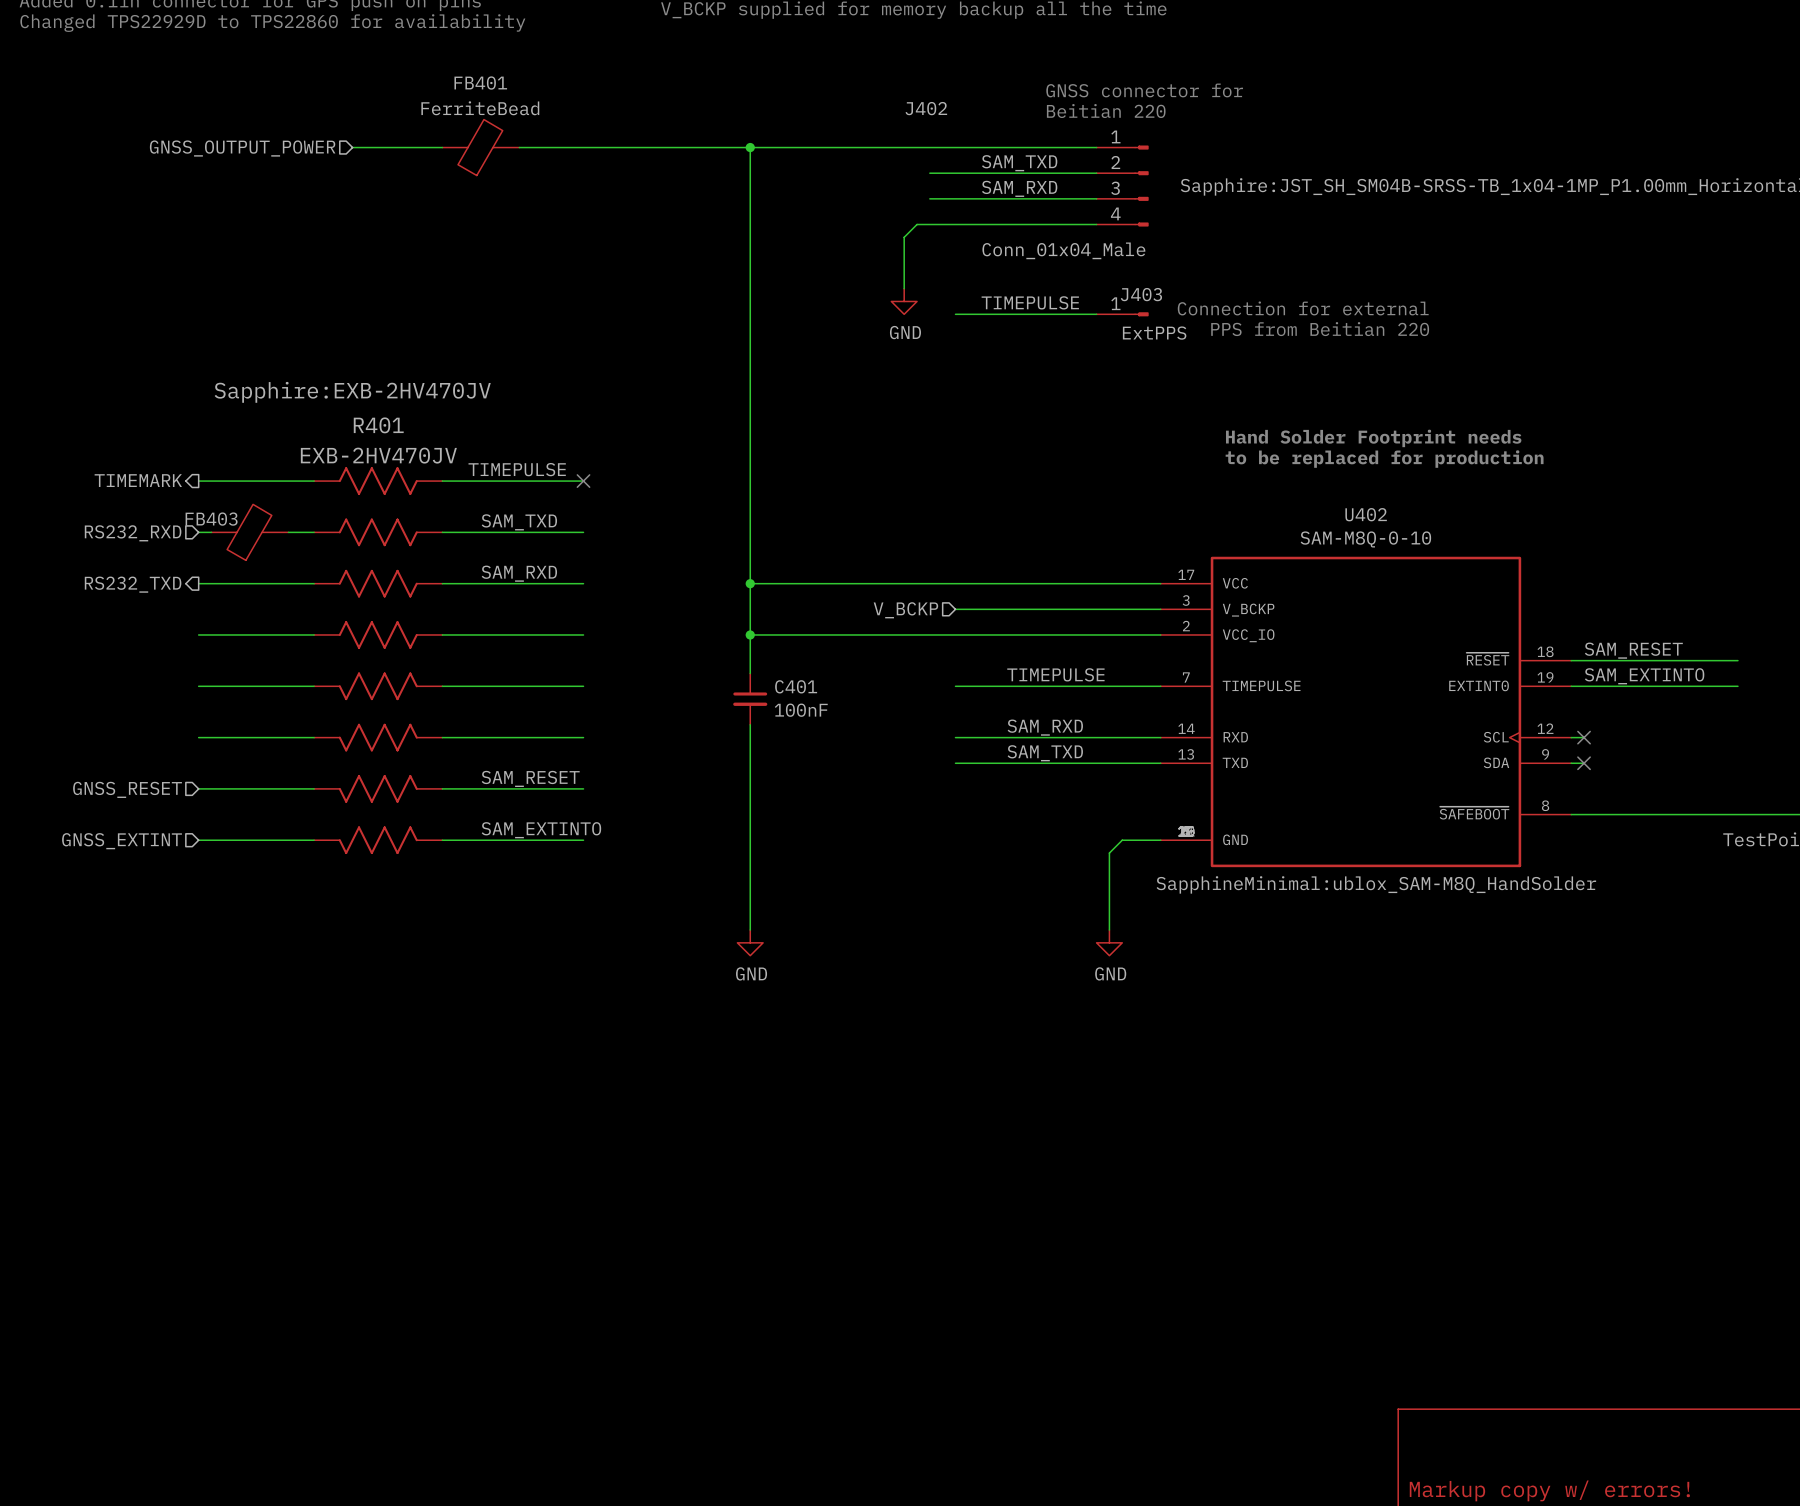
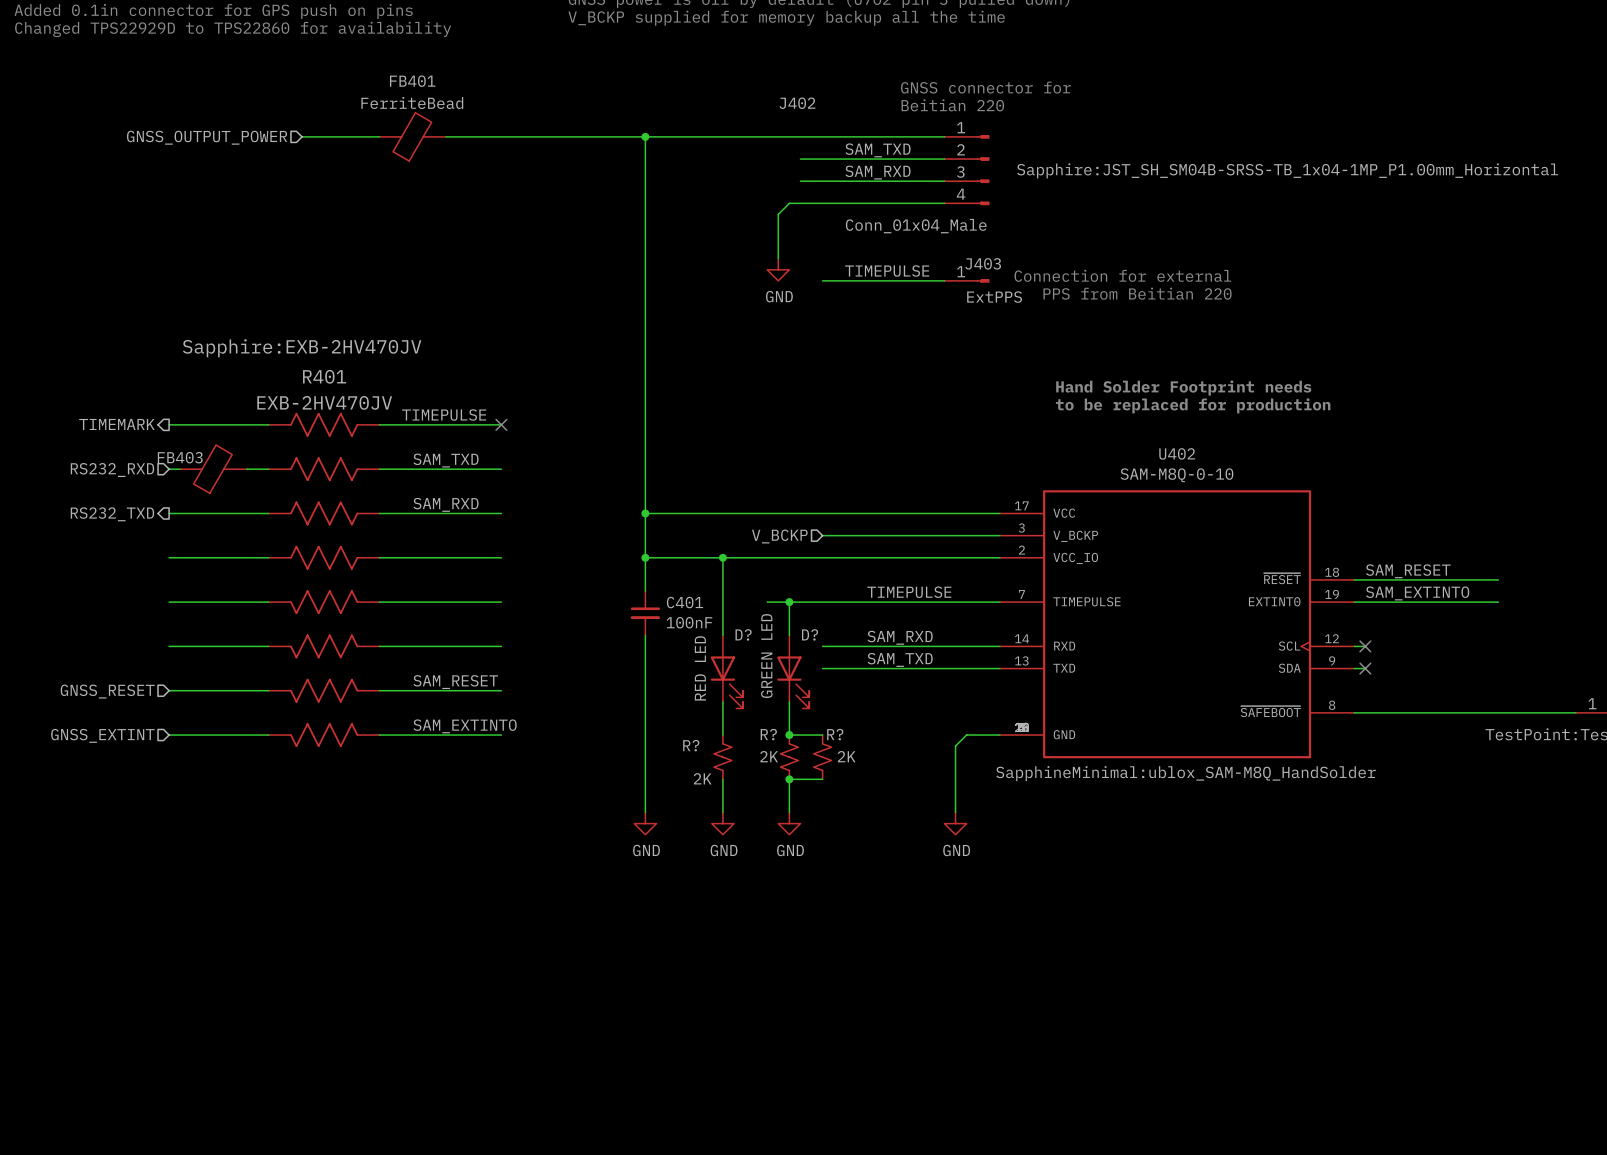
wire: none -> (722, 557) (722, 635)
junction: none -> (722, 557)
wire: none -> (767, 602) (822, 602)
wire: none -> (789, 602) (789, 635)
junction: none -> (789, 602)
D?: none -> RED LED (726, 671)
D?: none -> GREEN LED (793, 671)
wire: none -> (722, 701) (722, 735)
wire: none -> (789, 701) (789, 735) (822, 735)
junction: none -> (789, 735)
R?: none -> 2K (722, 757)
R?: none -> 2K (789, 757)
R?: none -> 2K (822, 757)
wire: none -> (722, 779) (722, 812)
junction: none -> (789, 779)
wire: none -> (822, 779) (789, 779) (789, 812)
power symbol: none -> GND (722, 823)
power symbol: none -> GND (789, 823)

